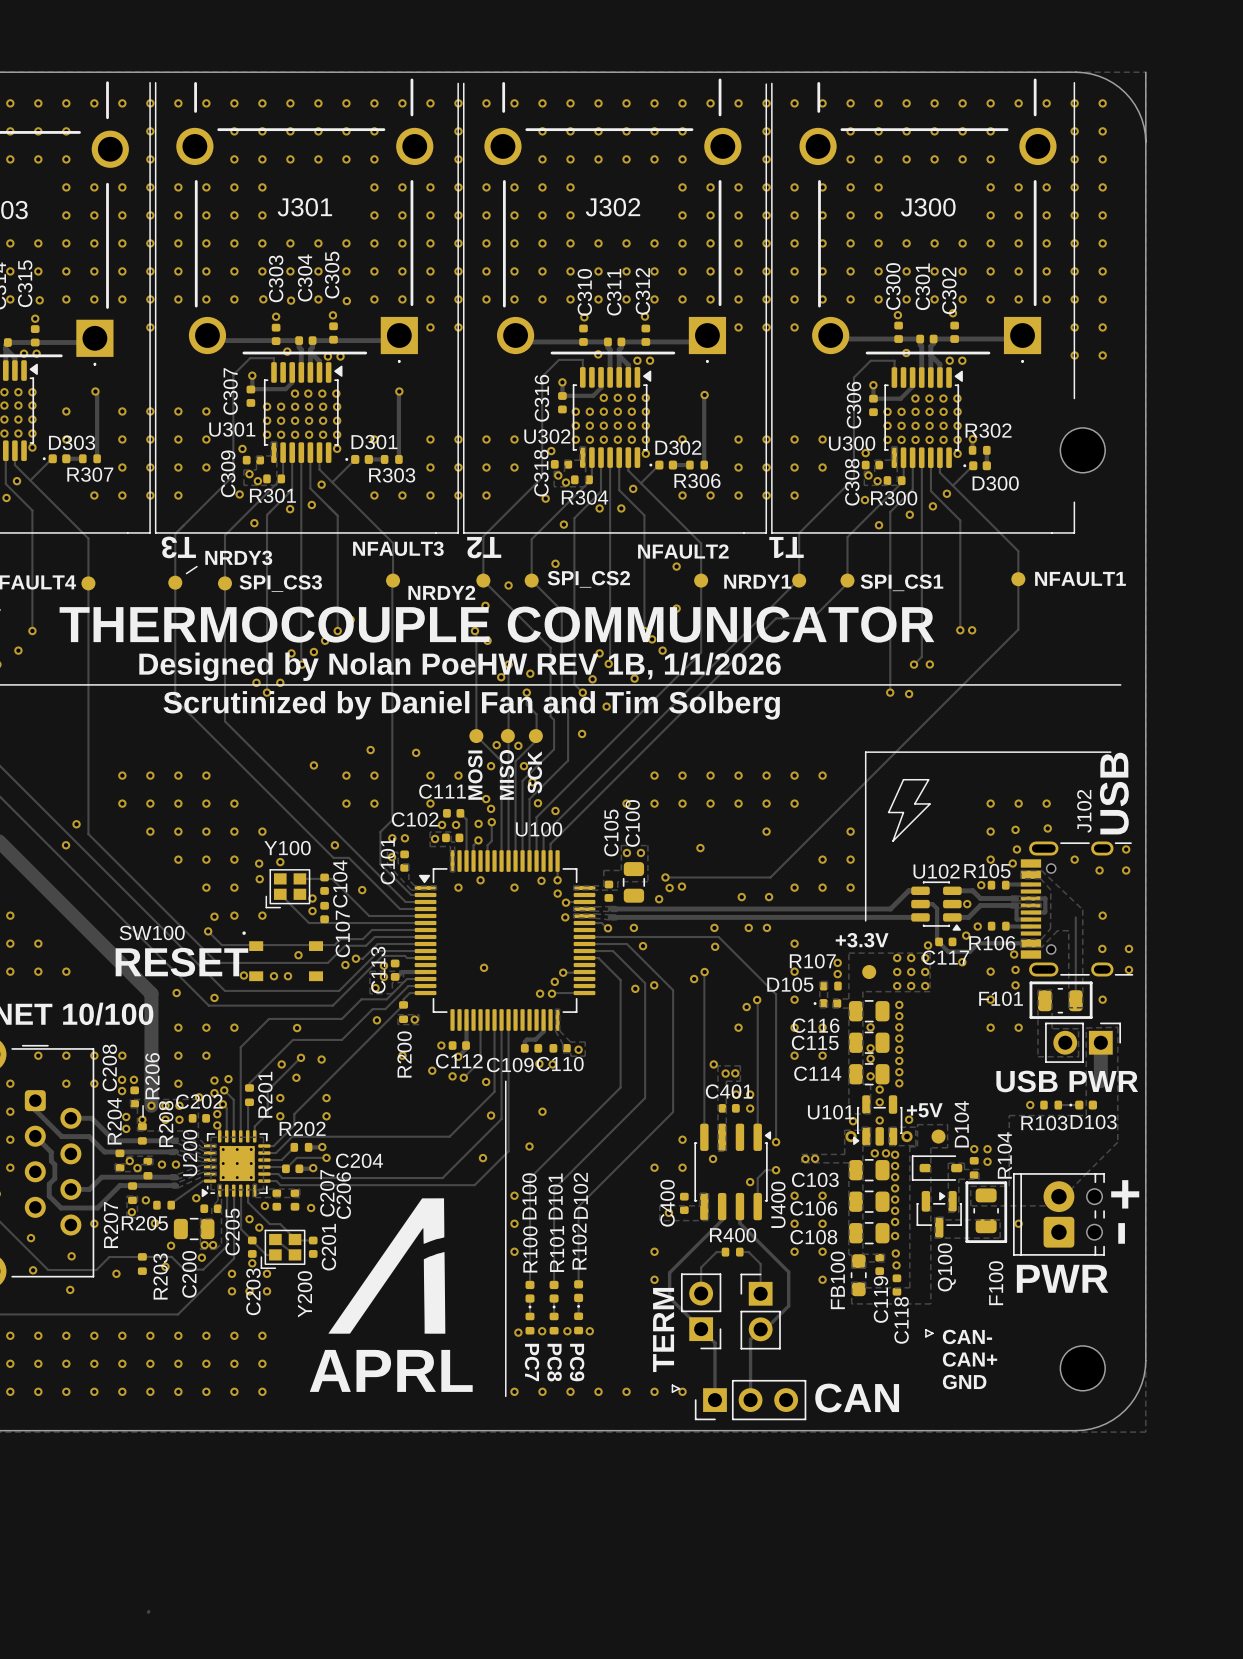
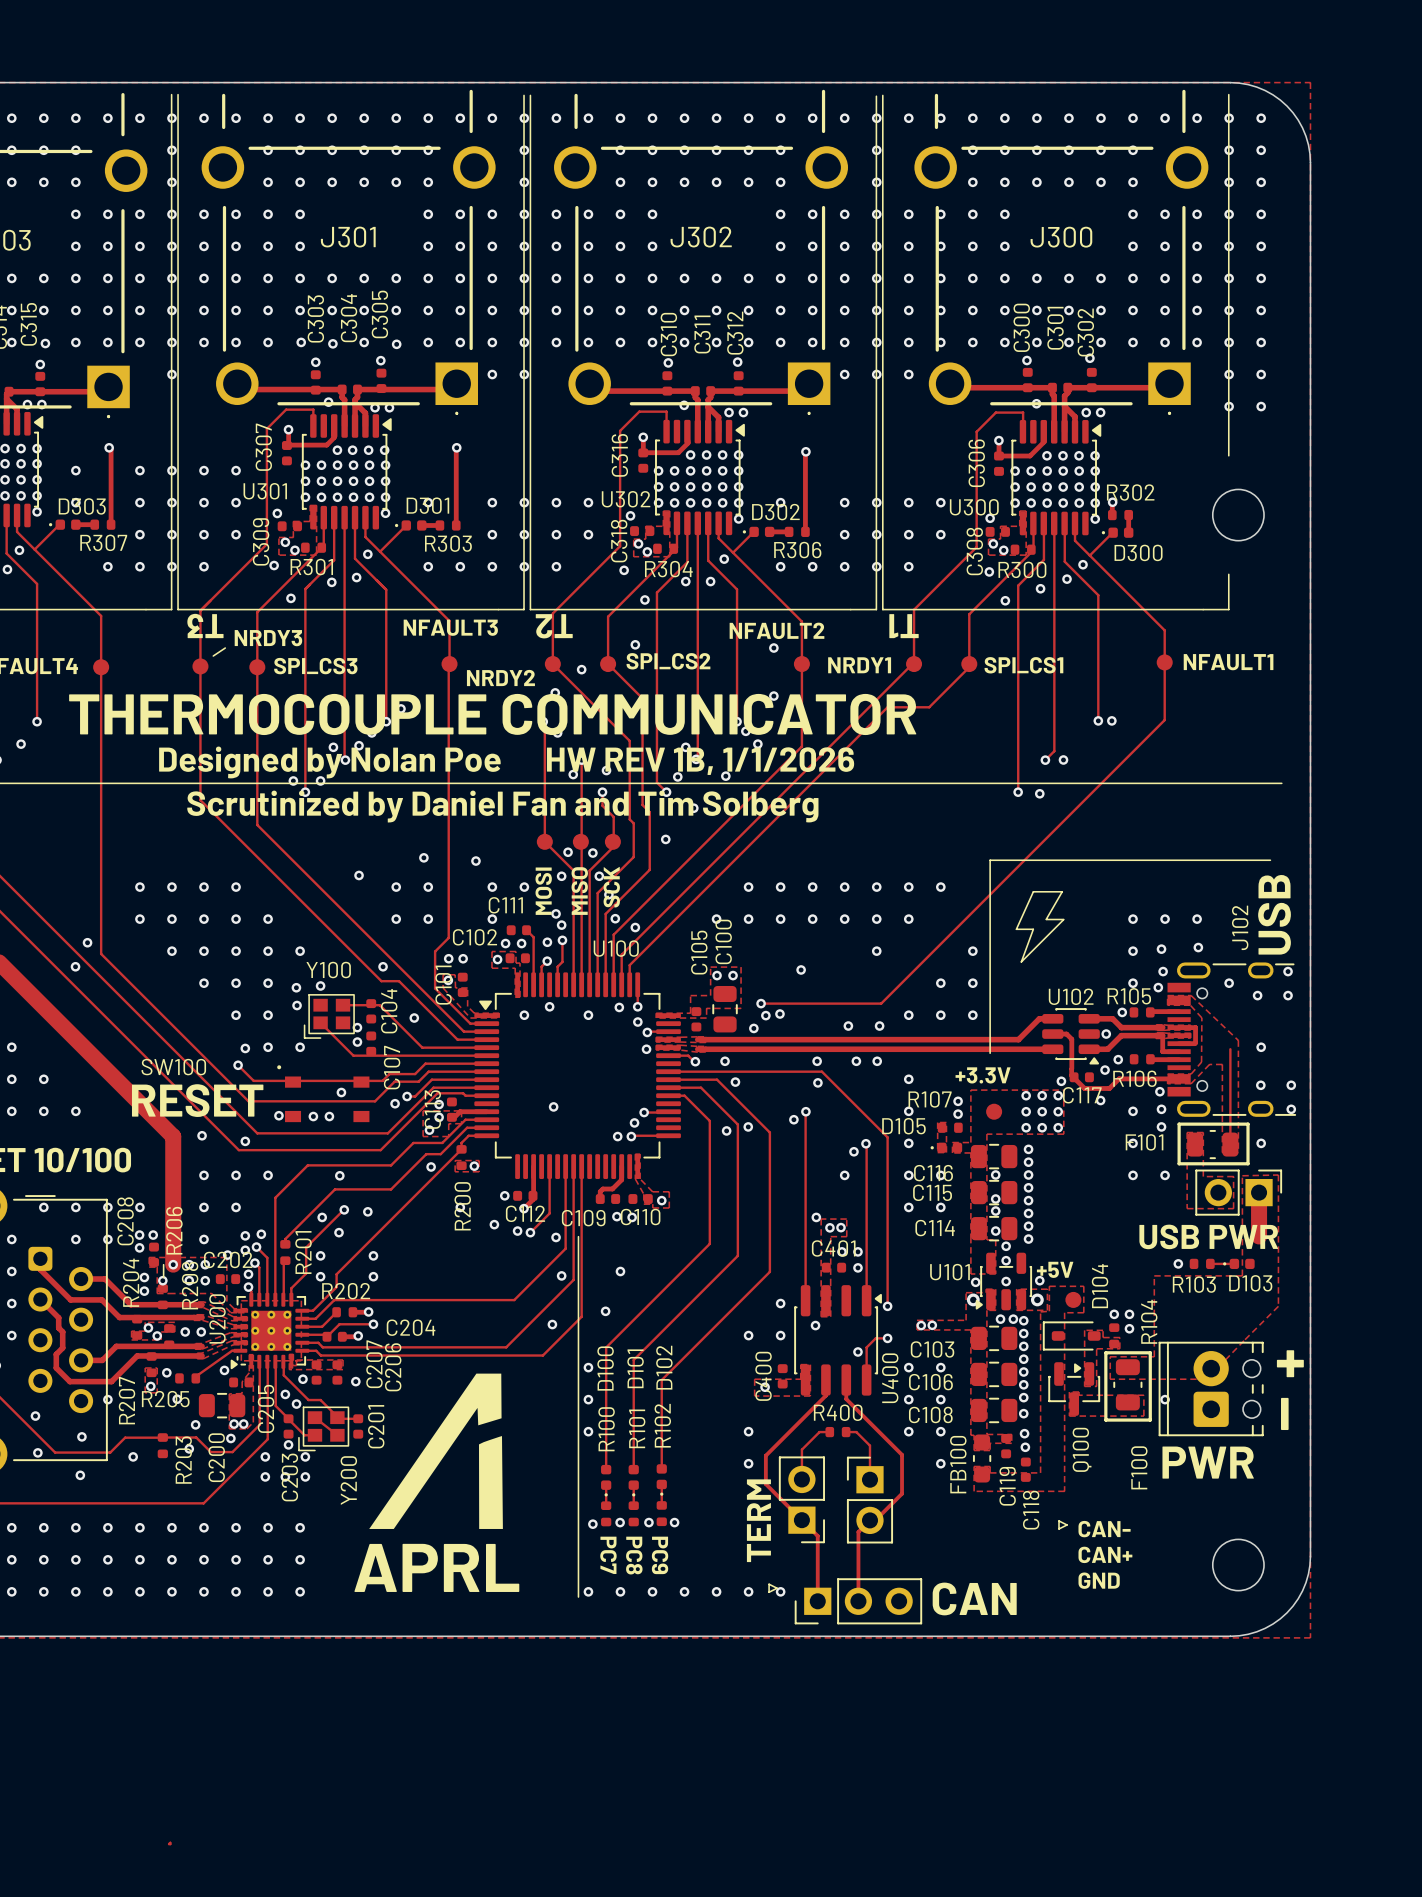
board edge: (1145, 72) (1145, 142) -> none
drawing shape: [328, 1198, 446, 1334] -> [369, 1373, 503, 1529]

